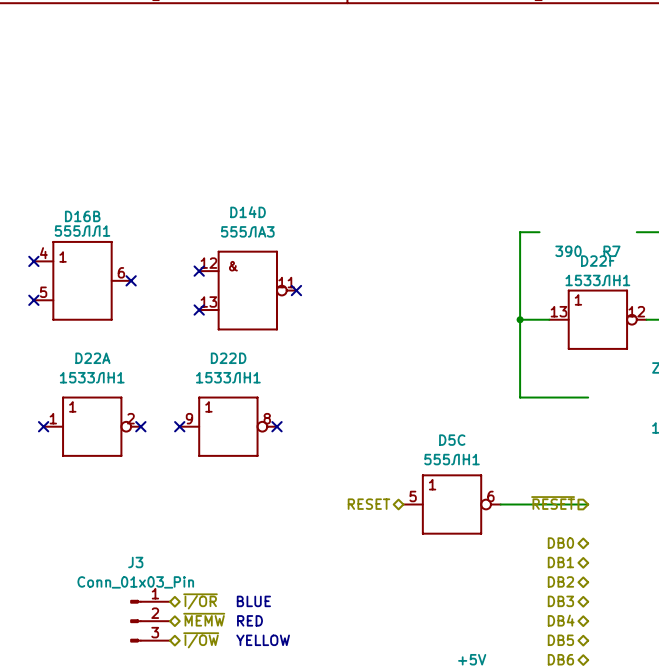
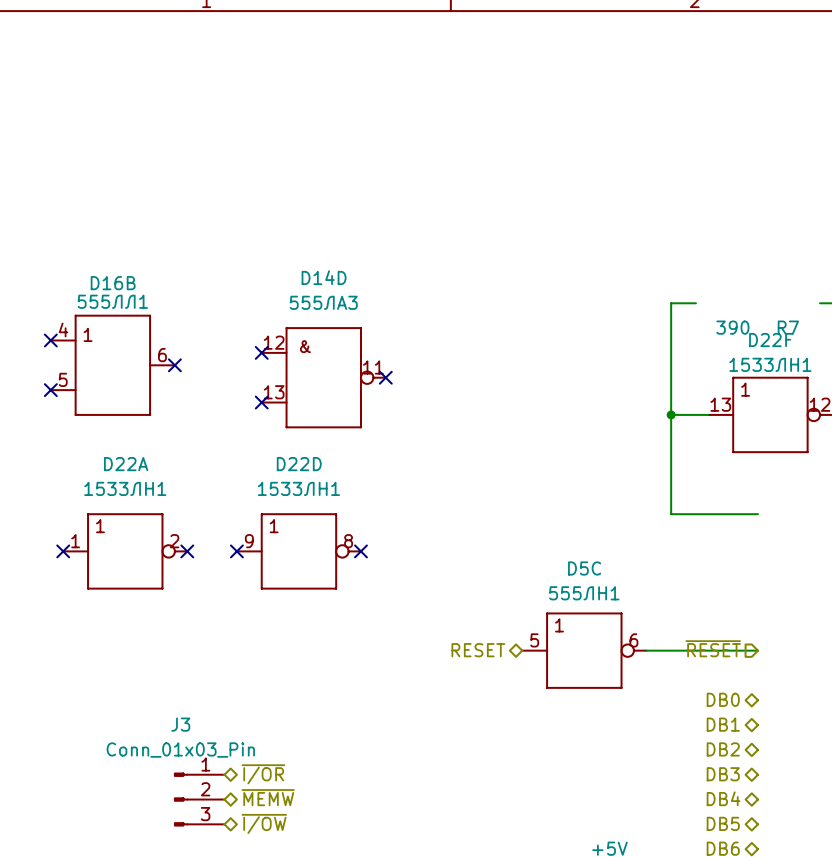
text: BLUE (253, 601) -> none
text: RED (249, 620) -> none
text: YELLOW (263, 640) -> none

